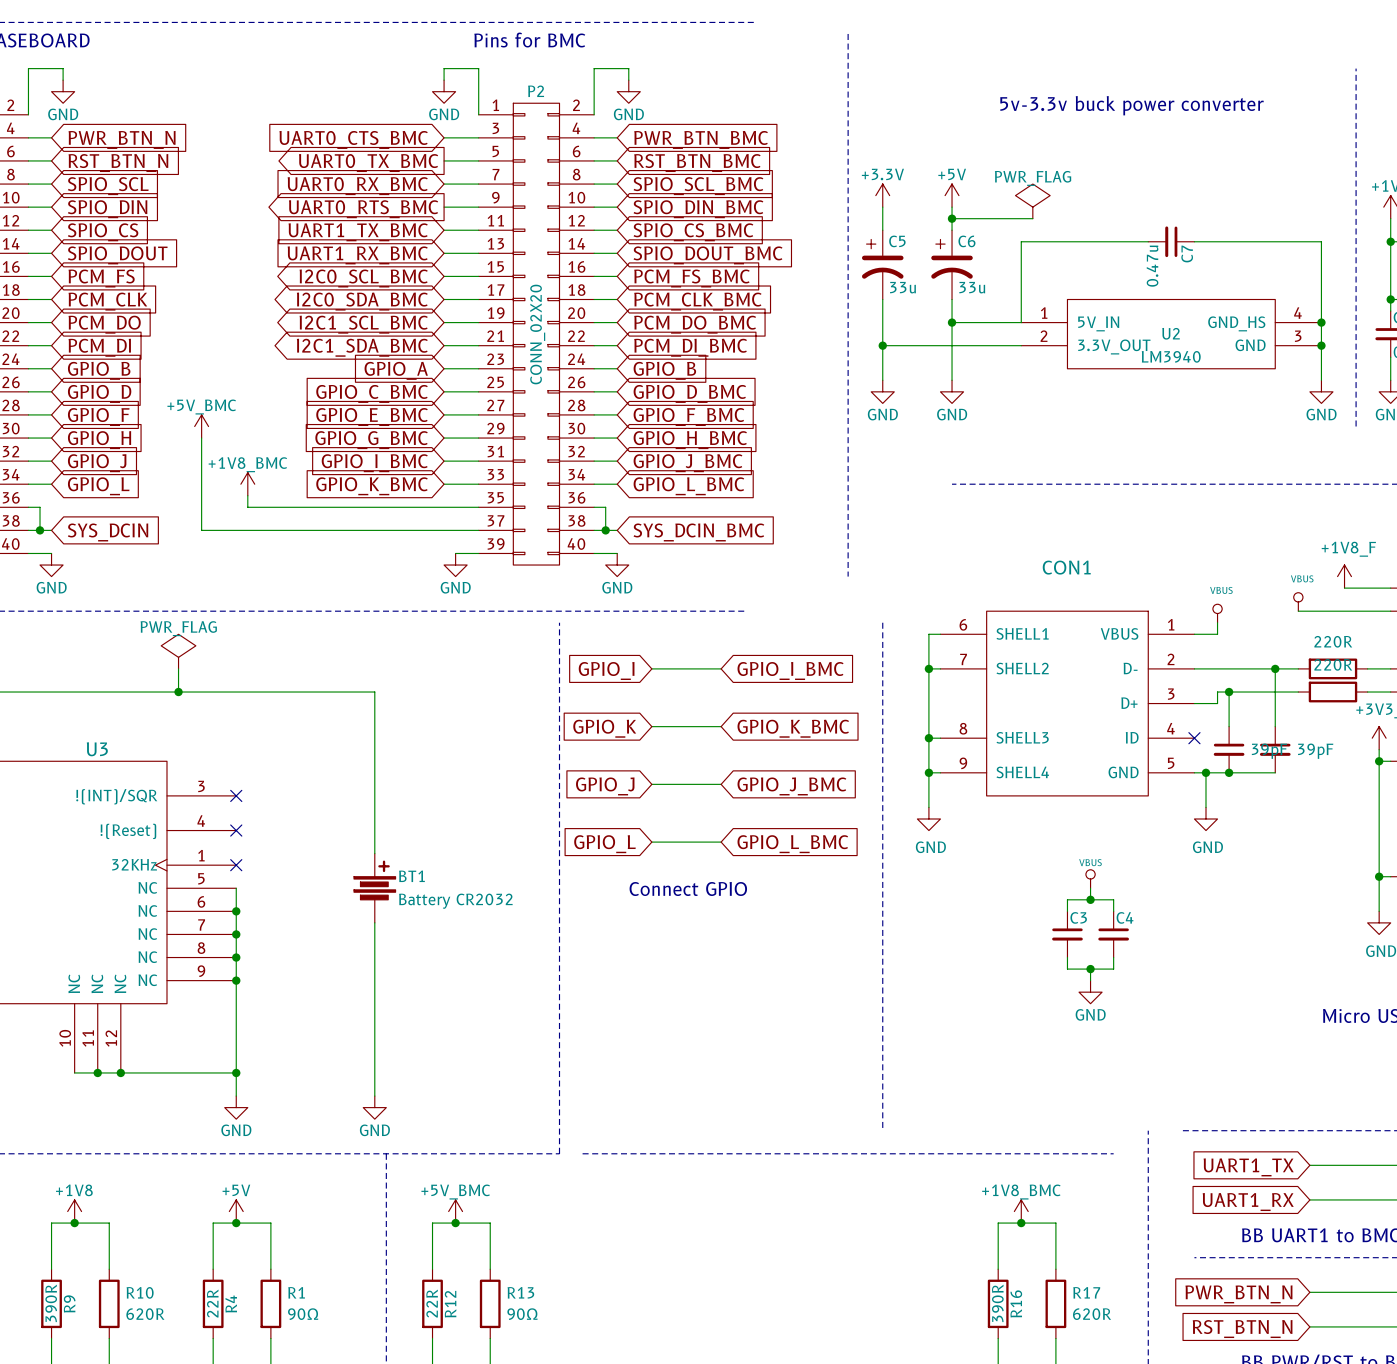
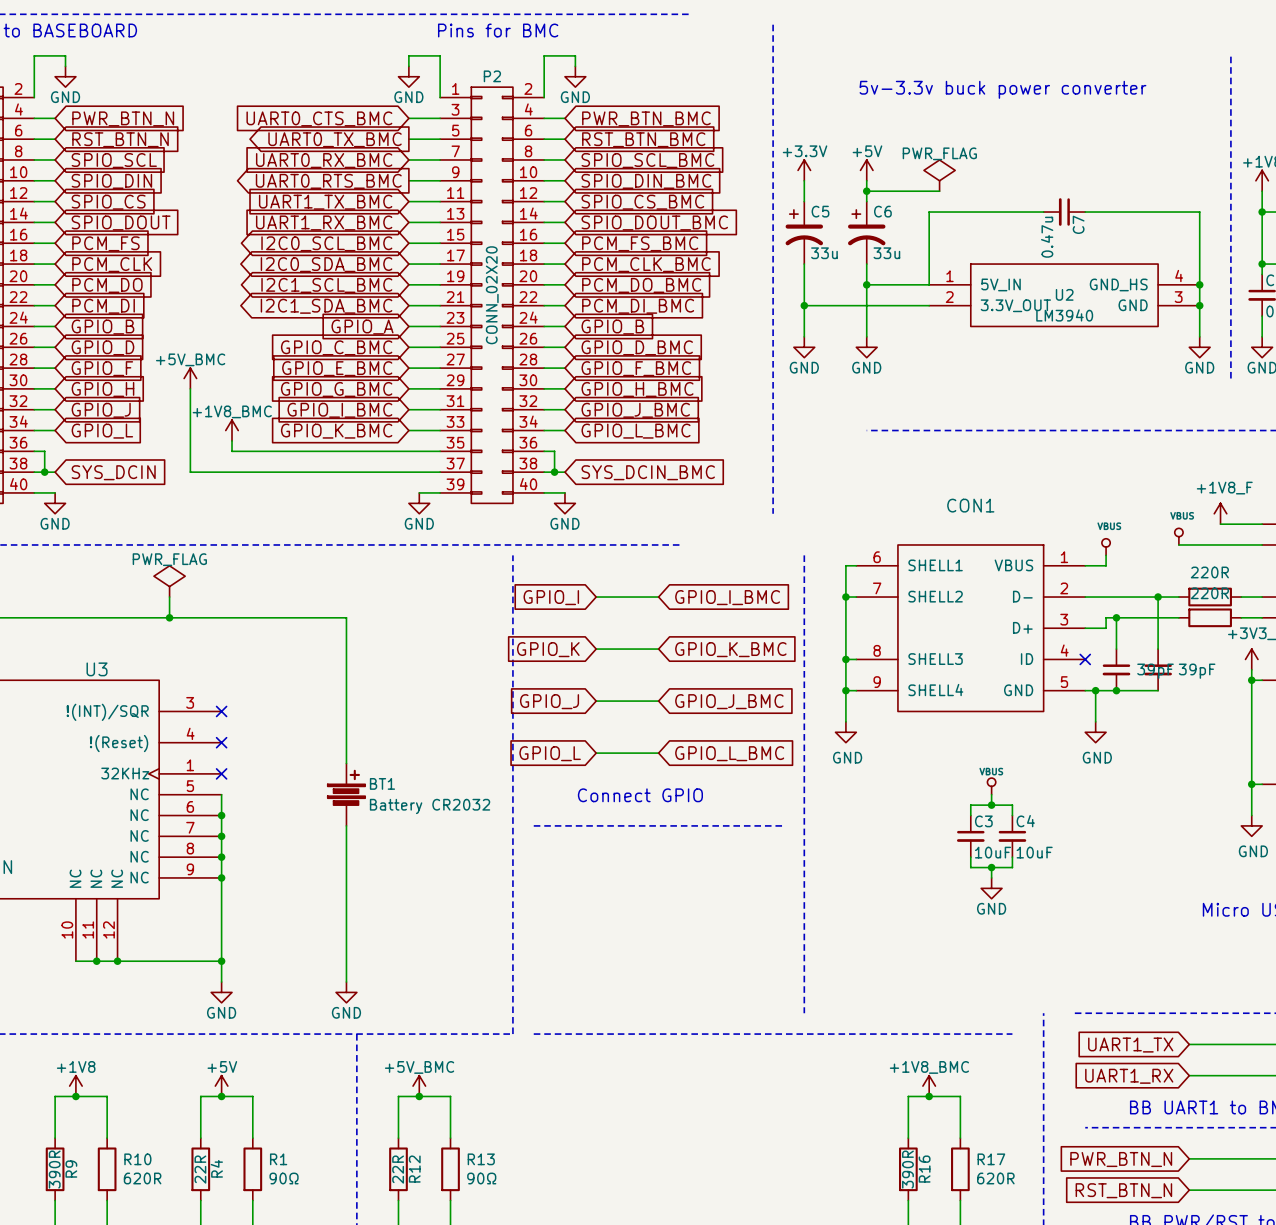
line: none -> (533, 825) (783, 825)
C3 value: none -> 10uF (993, 852)
C4 value: none -> 10uF (1034, 852)

